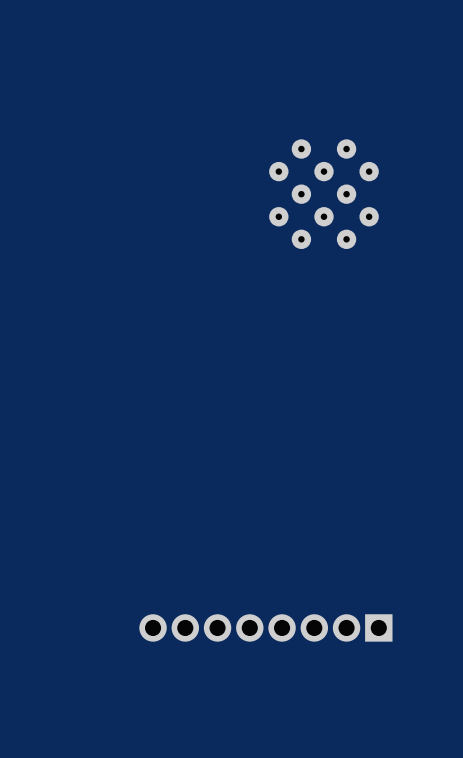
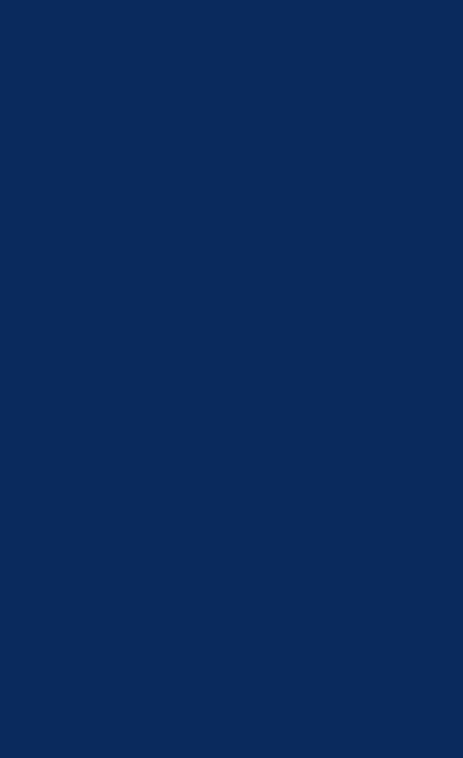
part: (323, 194) -> none
part: (265, 627) -> none

